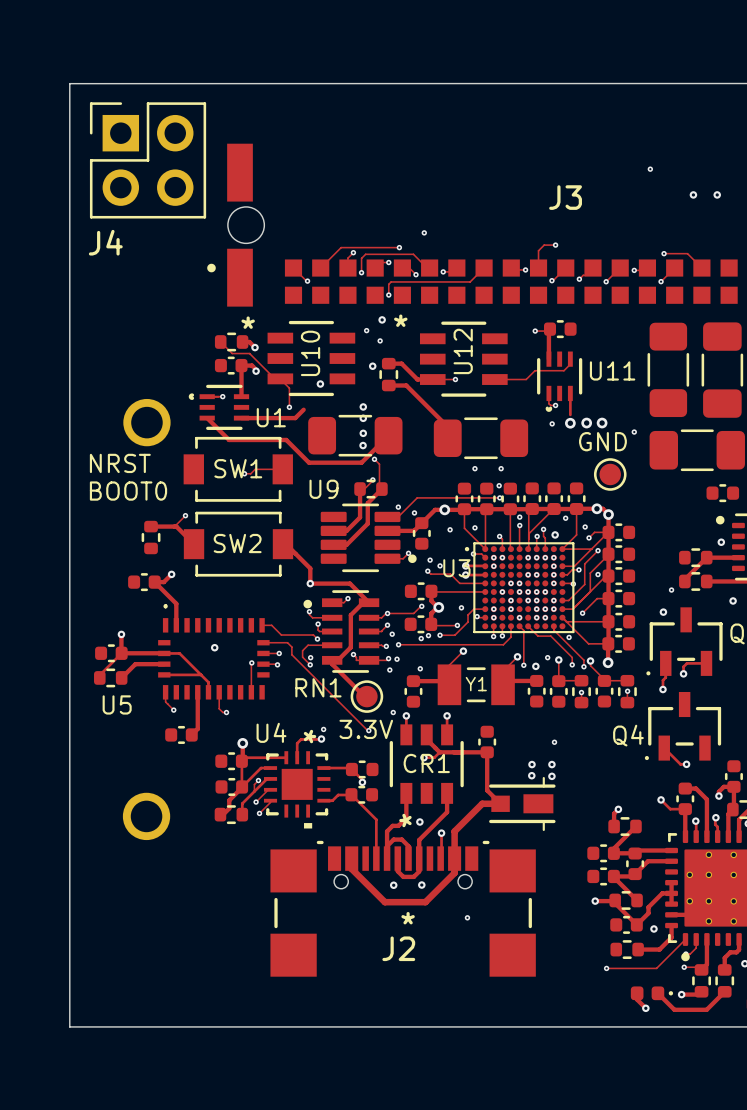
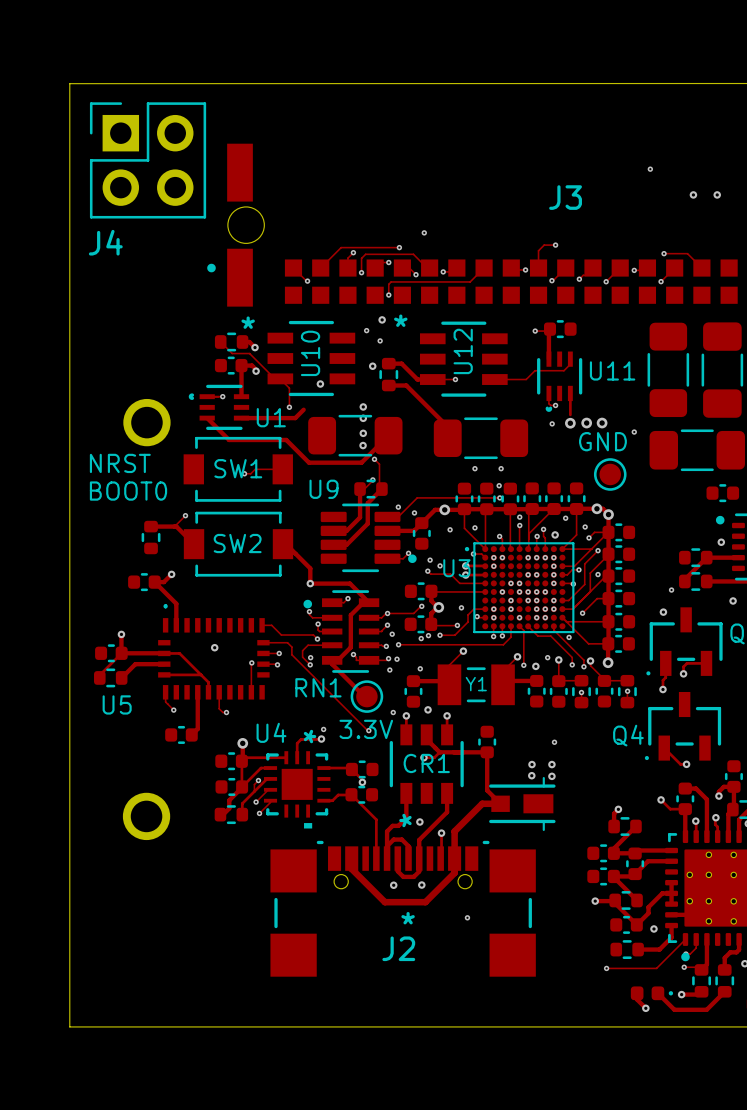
via: none -> (428, 709)

